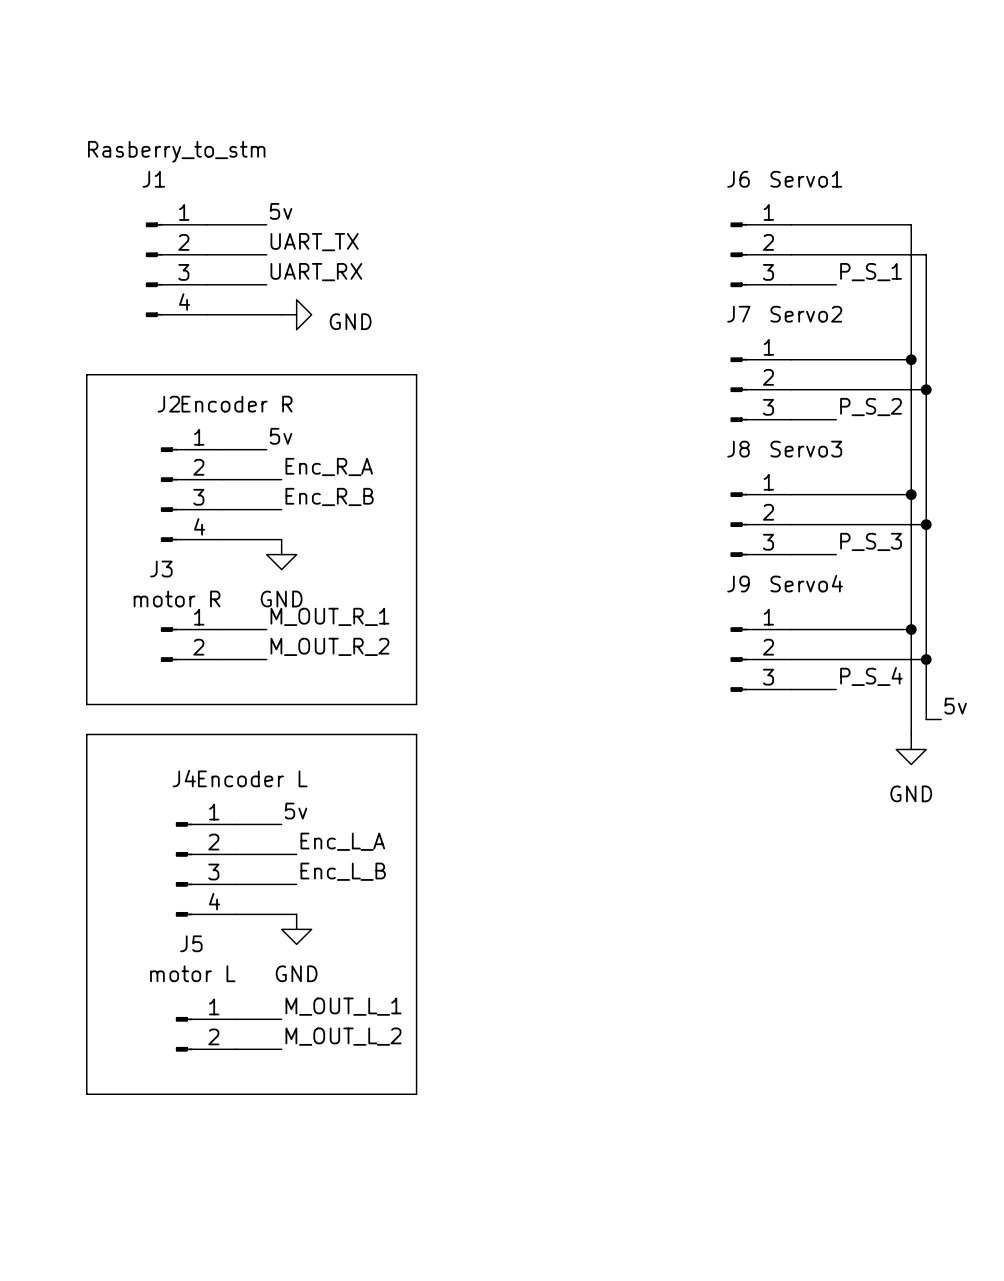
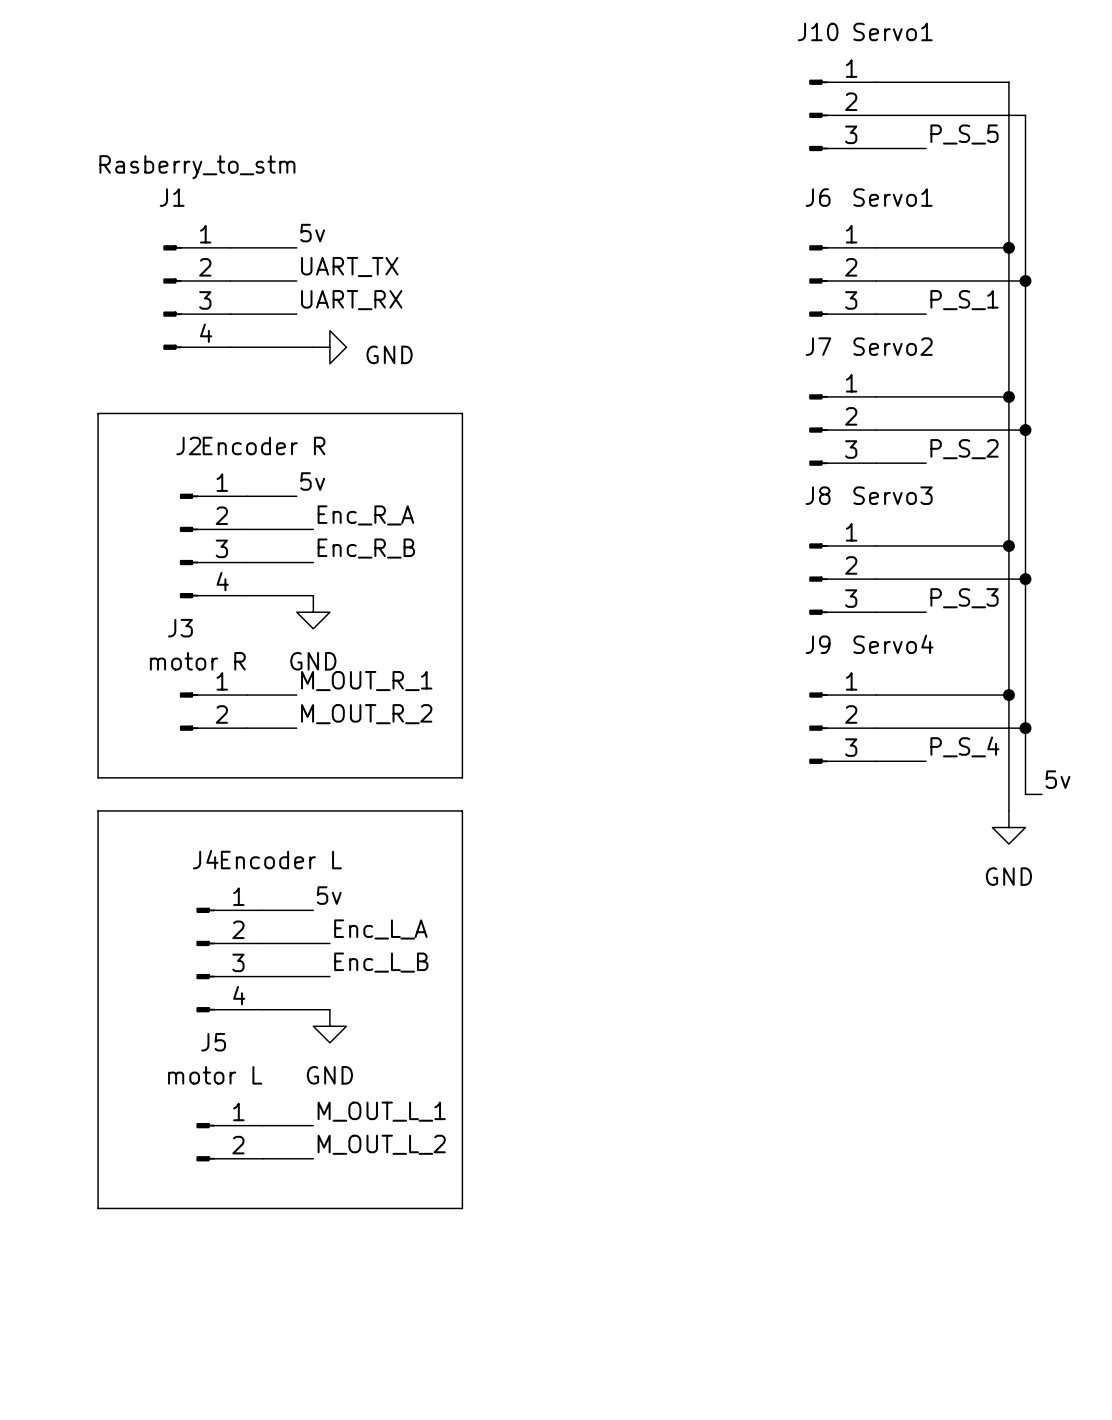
wire: none -> (876, 82) (1008, 82) (1008, 247)
J10: none -> Servo1 (842, 115)
wire: none -> (876, 115) (1025, 115) (1025, 280)
label: none -> P_S_5 (964, 134)
wire: none -> (876, 148) (926, 148)
junction: none -> (1008, 247)
junction: none -> (1025, 280)

